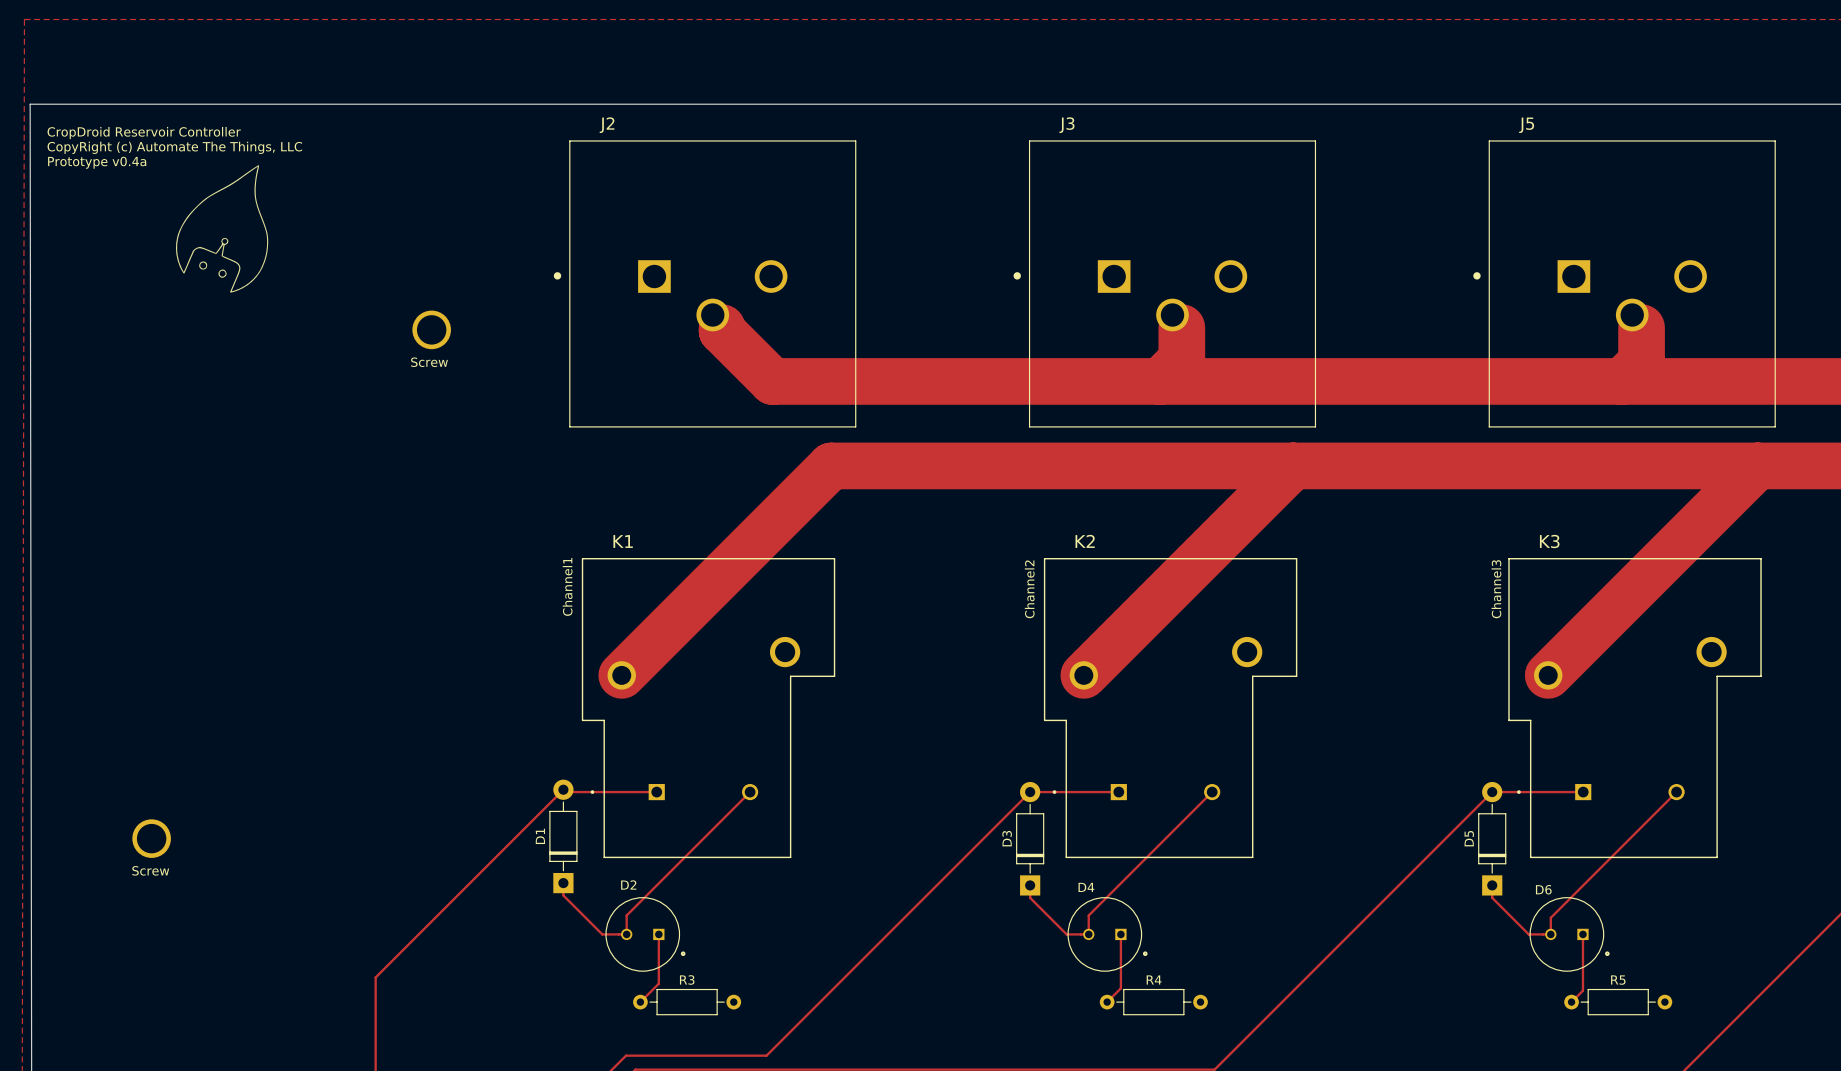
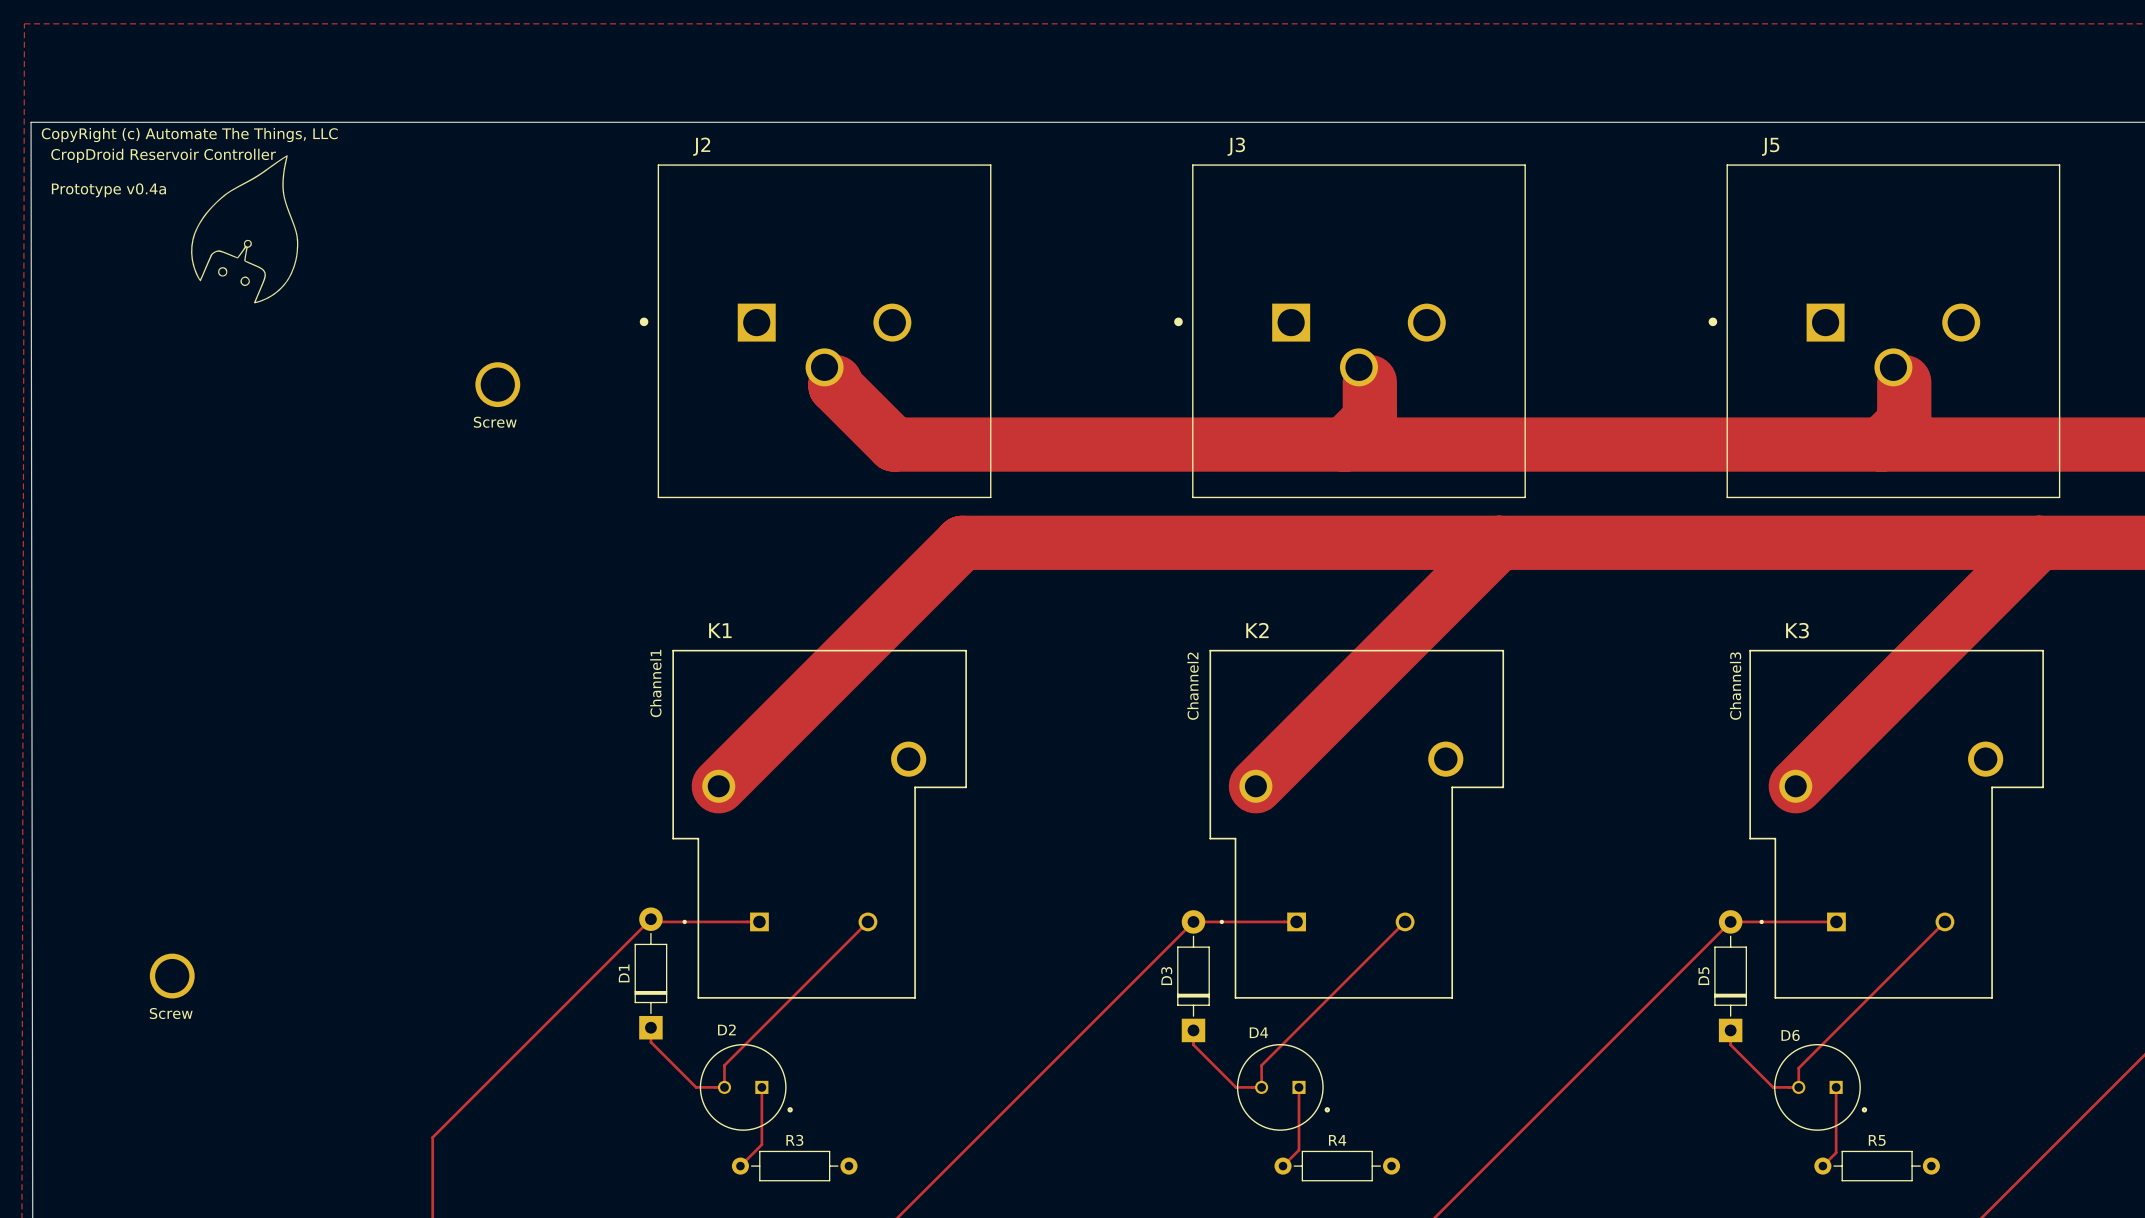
text position: CopyRight (c) Automate The Things, LLC (174, 147) -> CopyRight (c) Automate The Things, LLC (189, 135)
drawing position: (222, 228) -> (244, 229)

